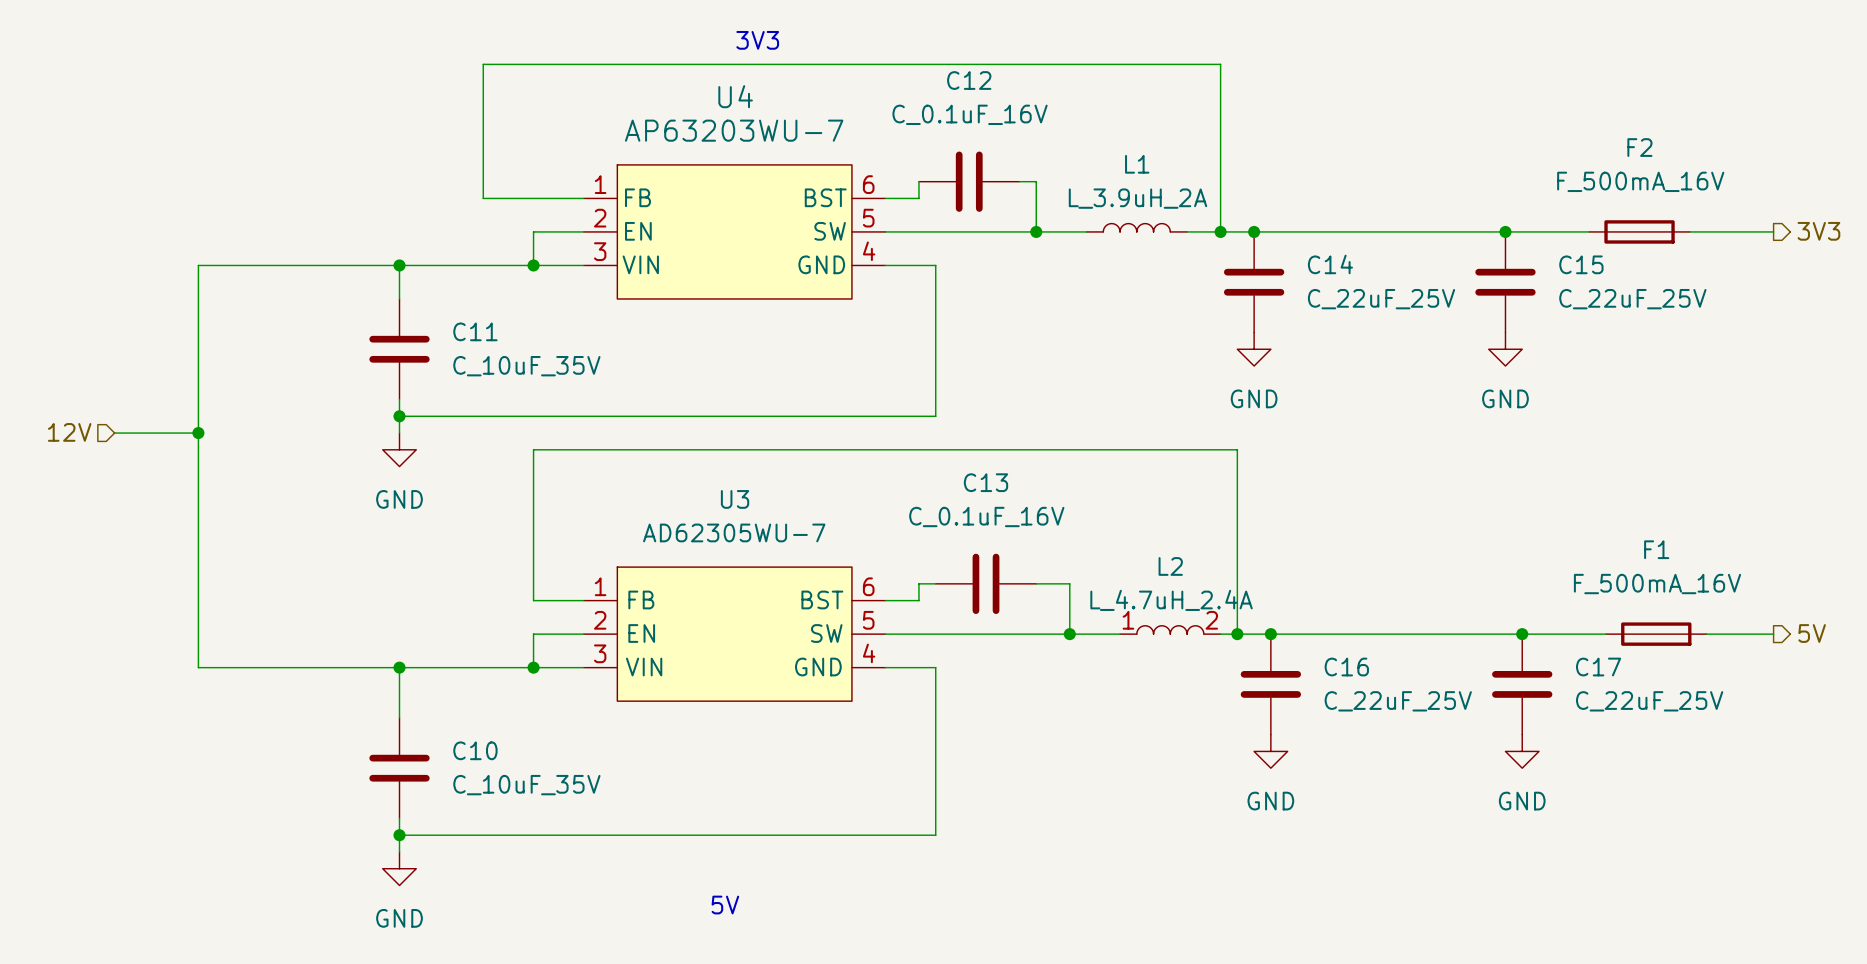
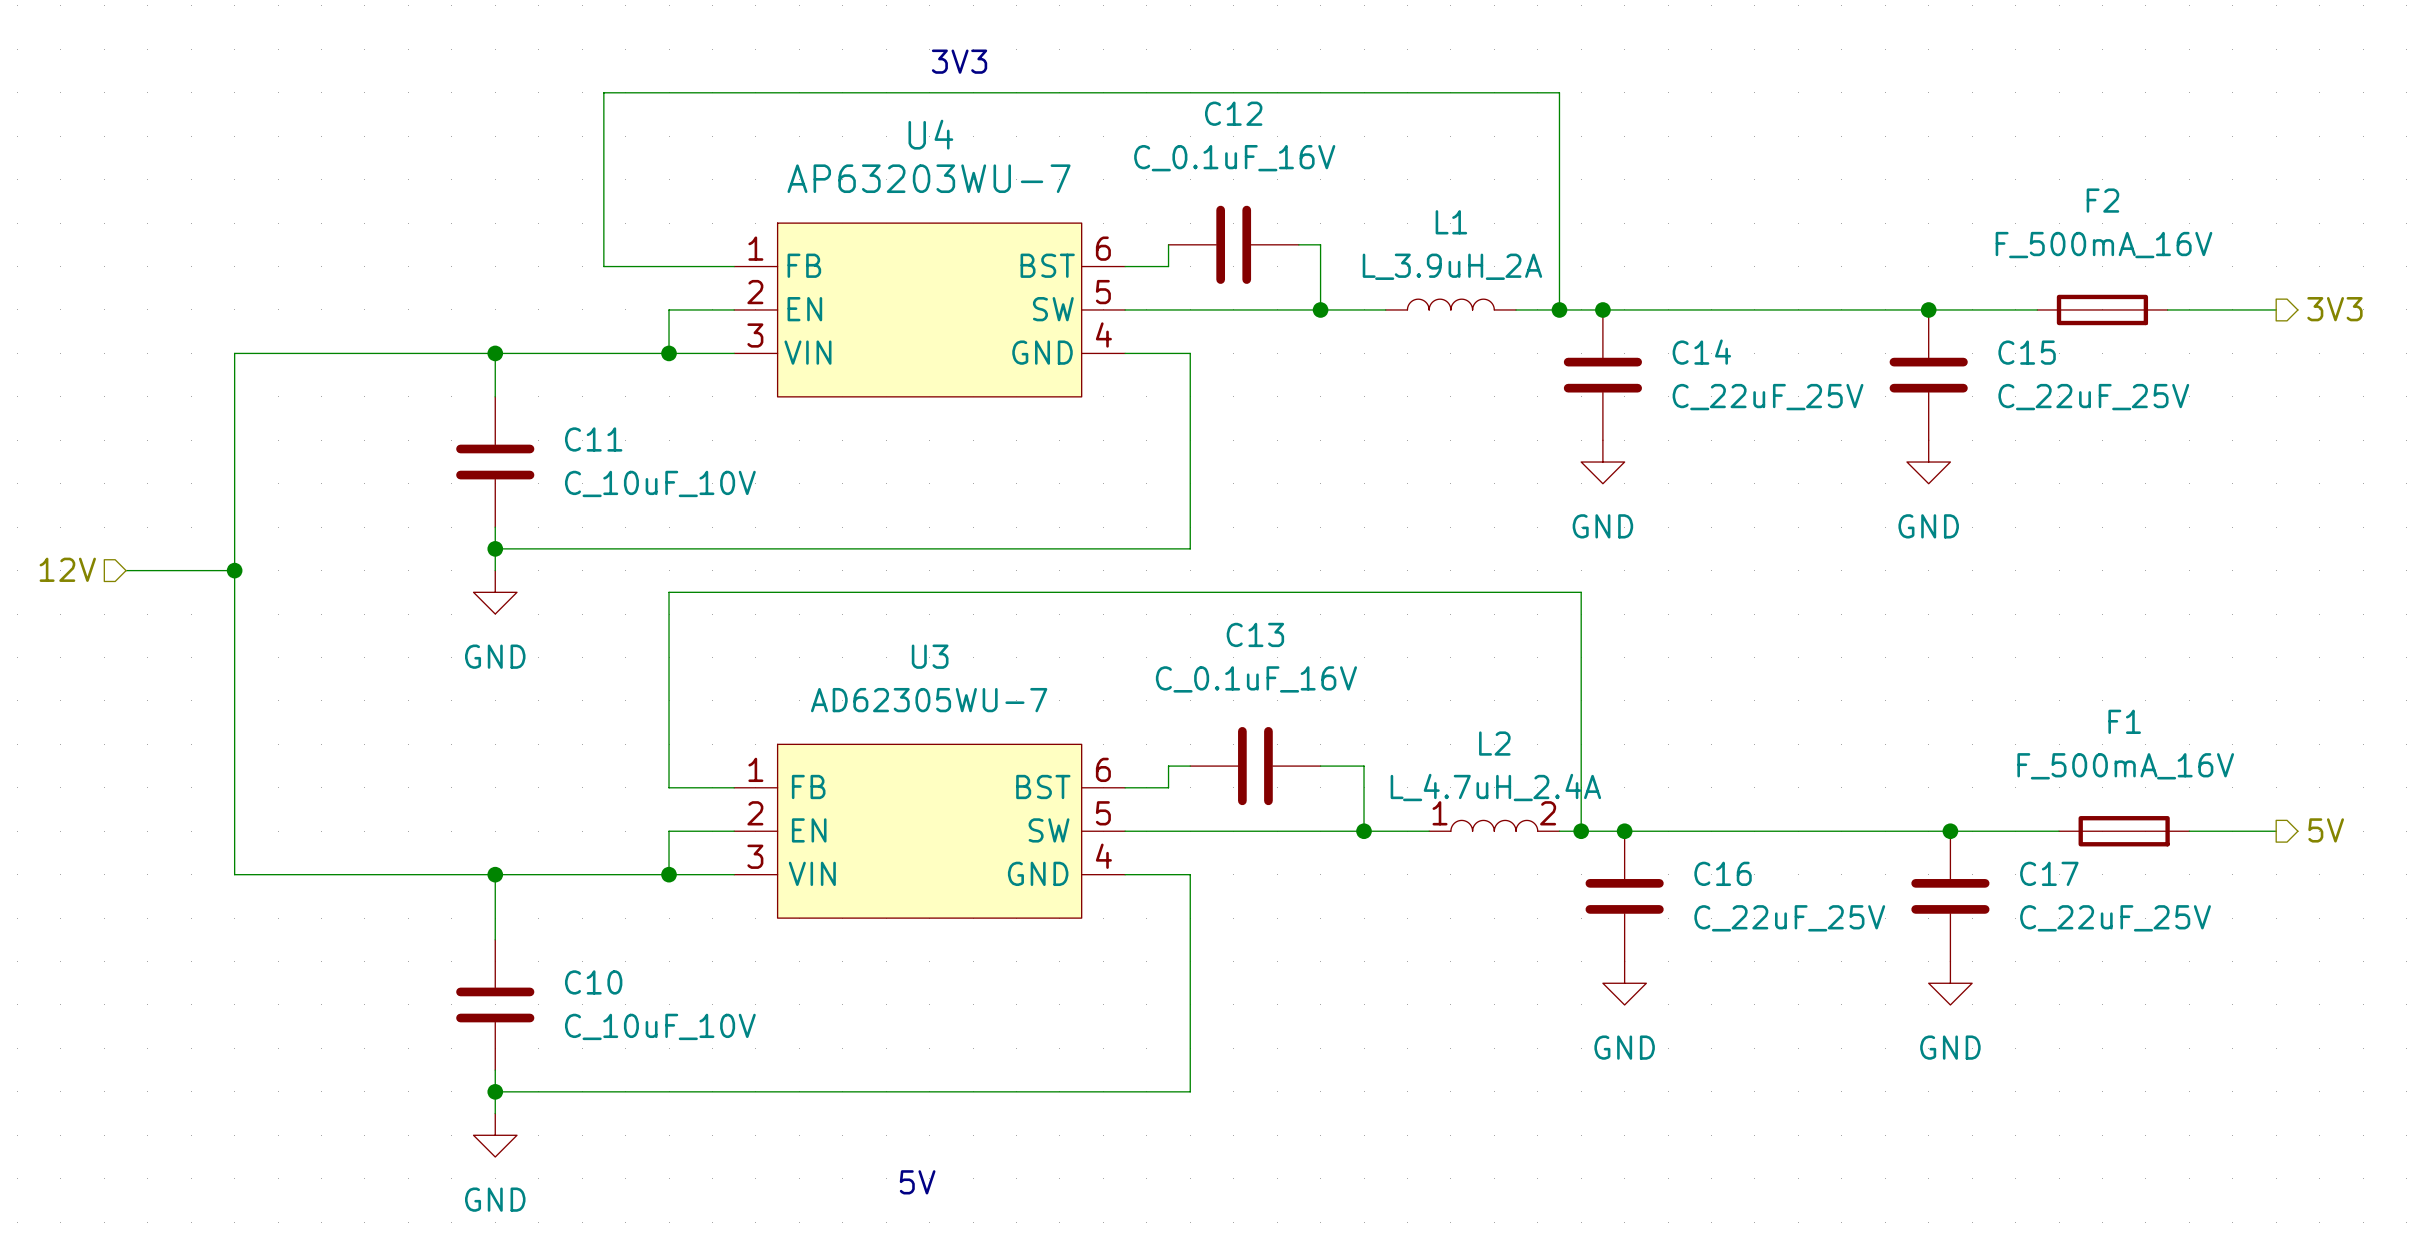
C11 value: C_10uF_35V (526, 366) -> C_10uF_10V (660, 483)
C10 value: C_10uF_35V (526, 785) -> C_10uF_10V (660, 1026)

